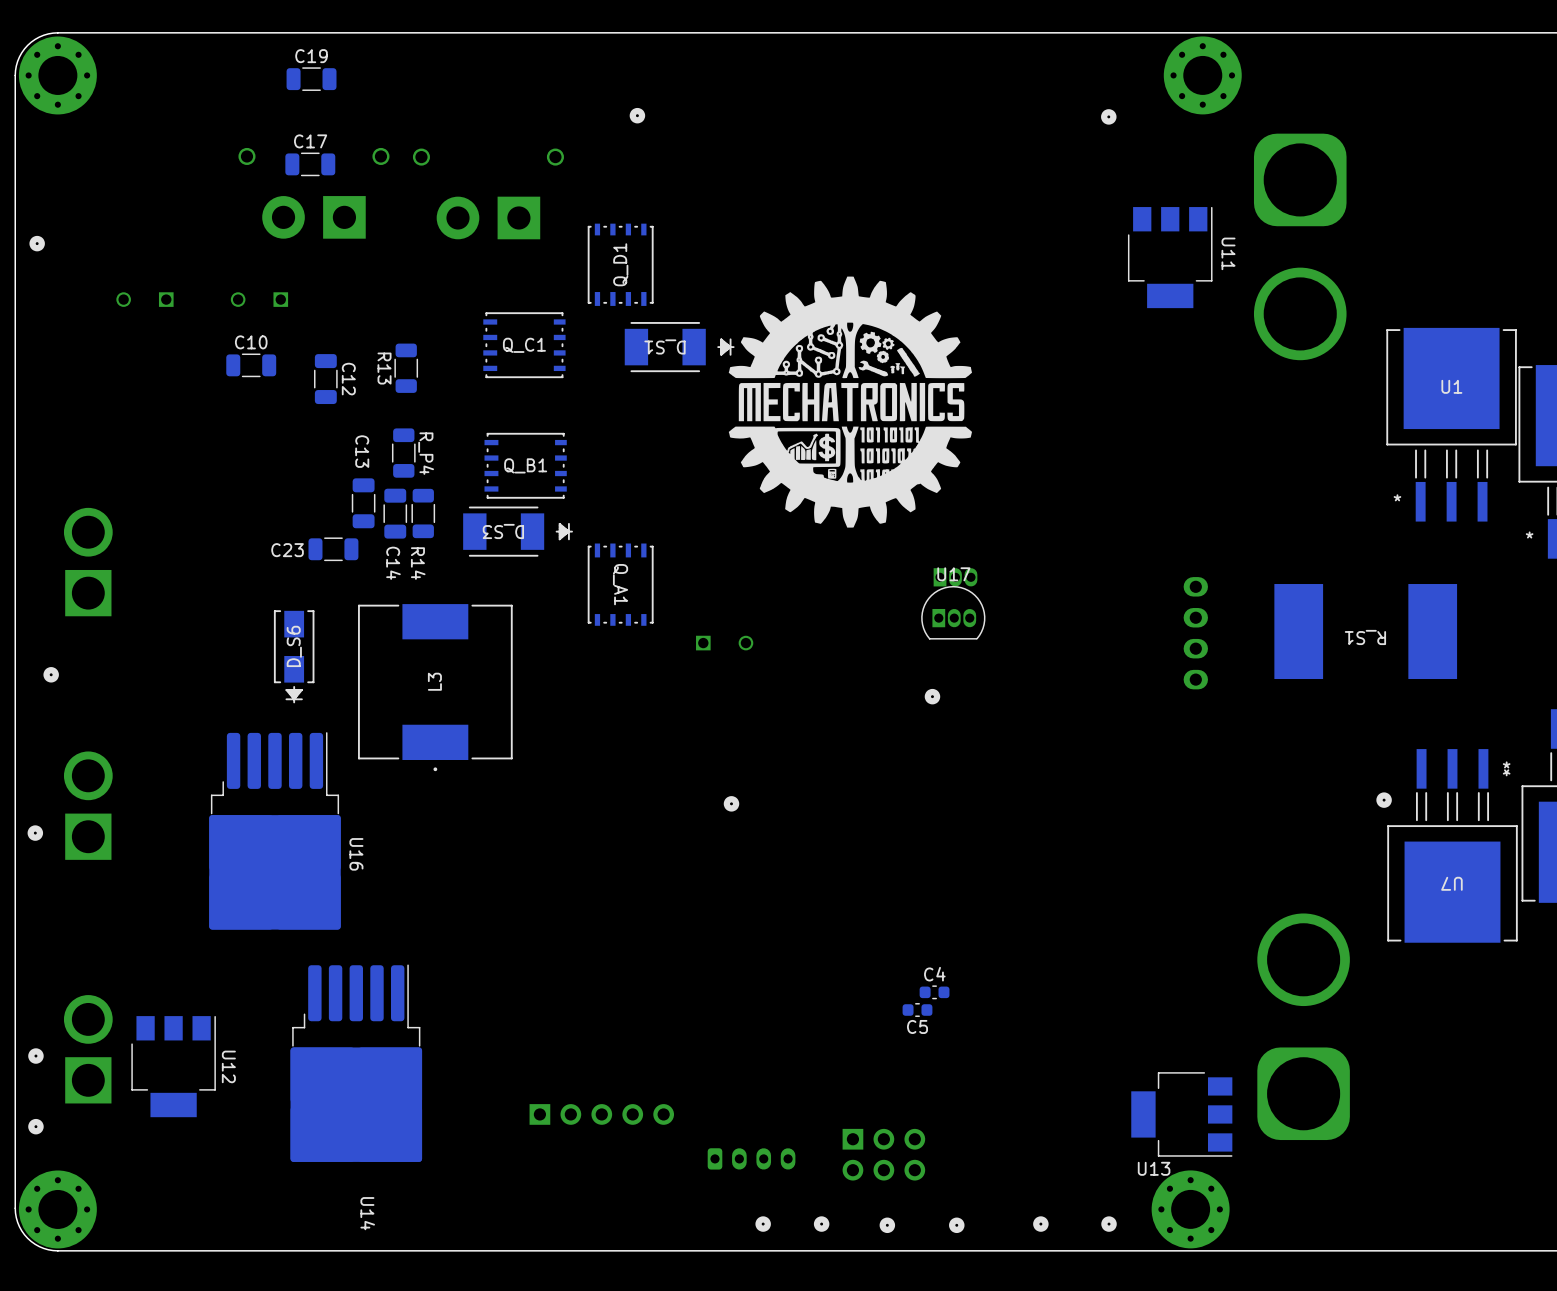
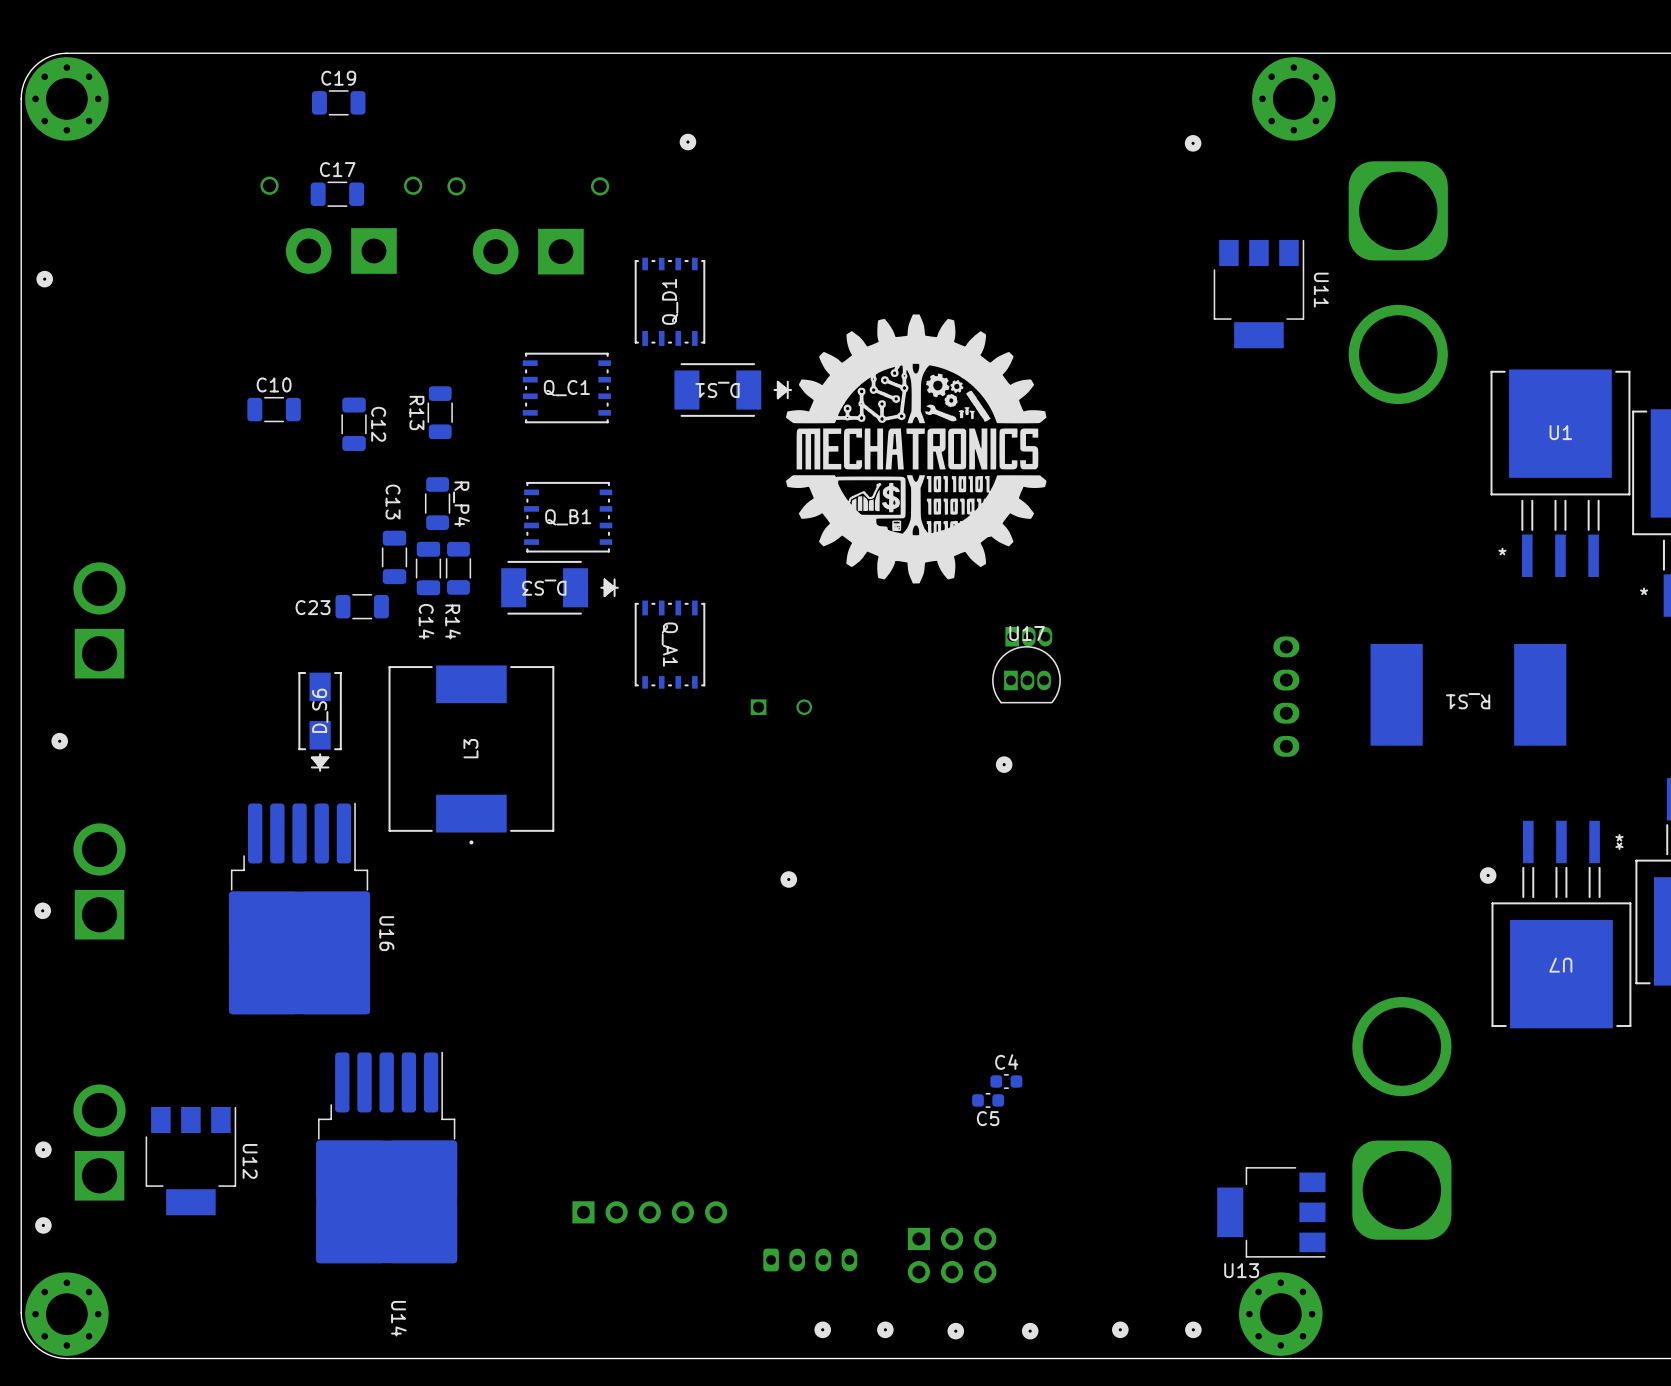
part: (144, 299) -> none
part: (259, 299) -> none

